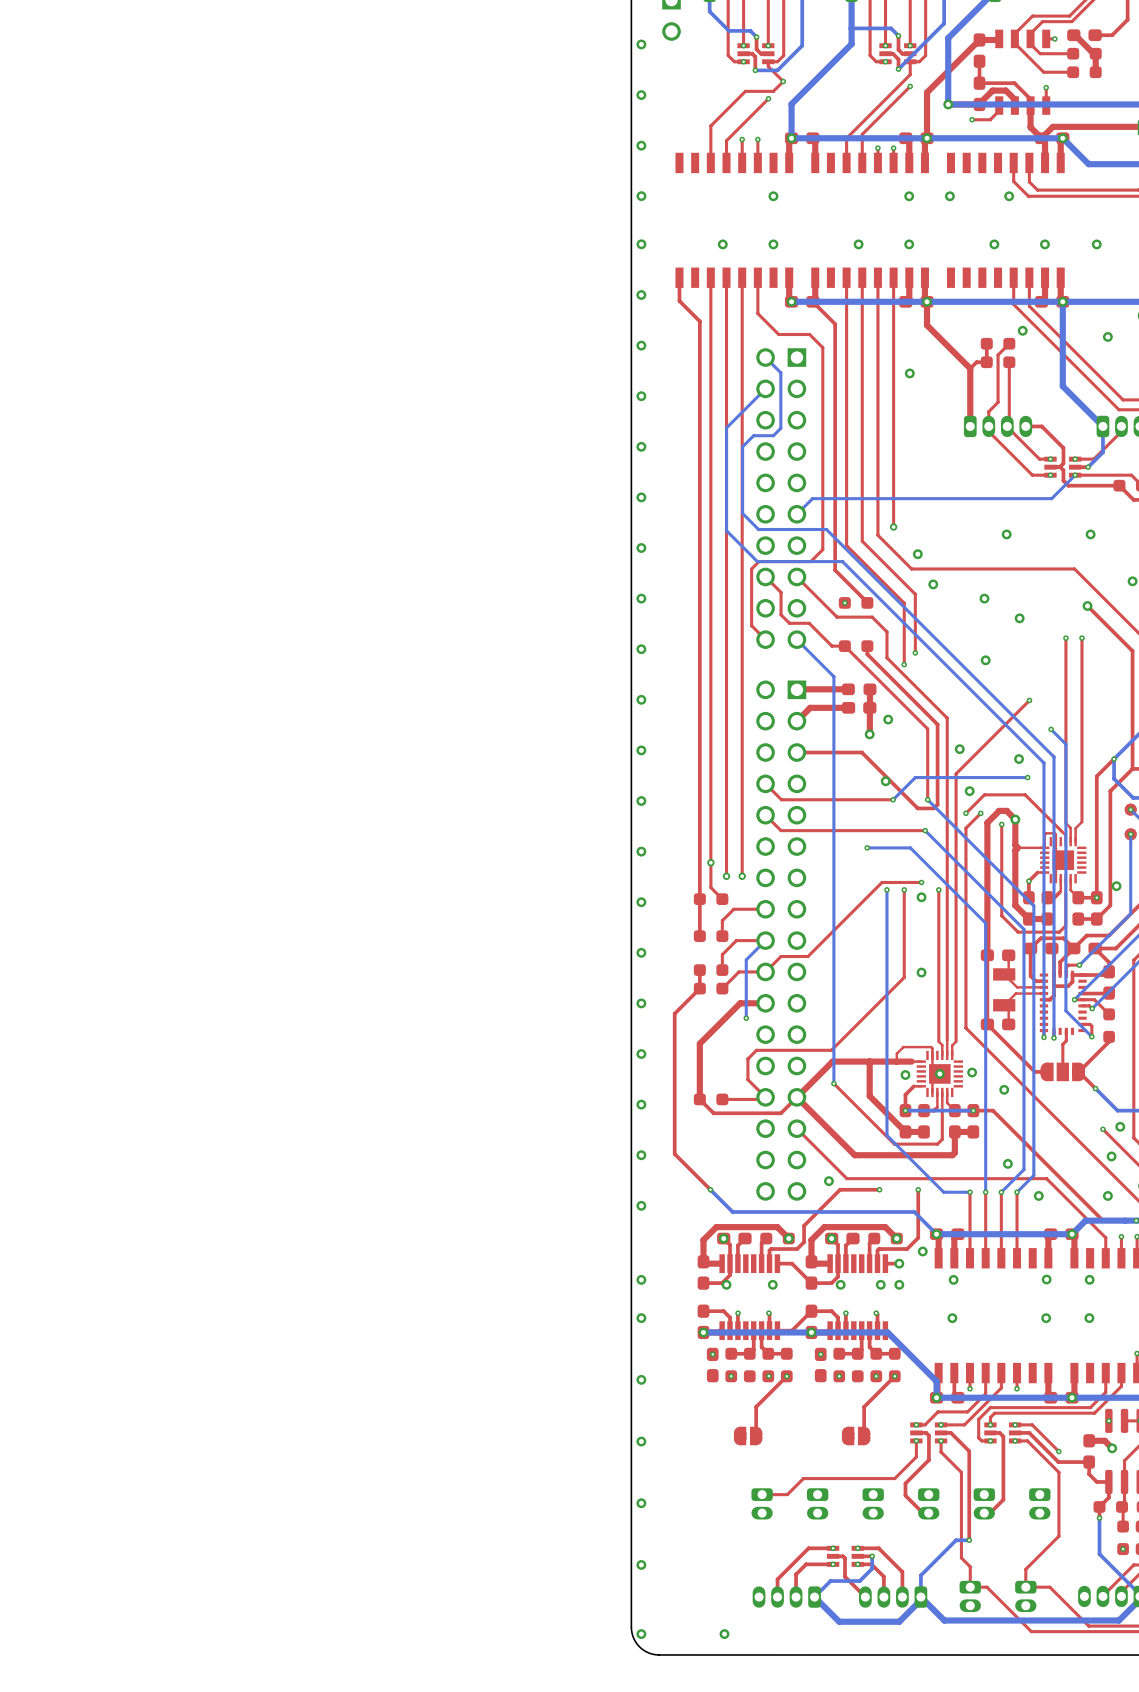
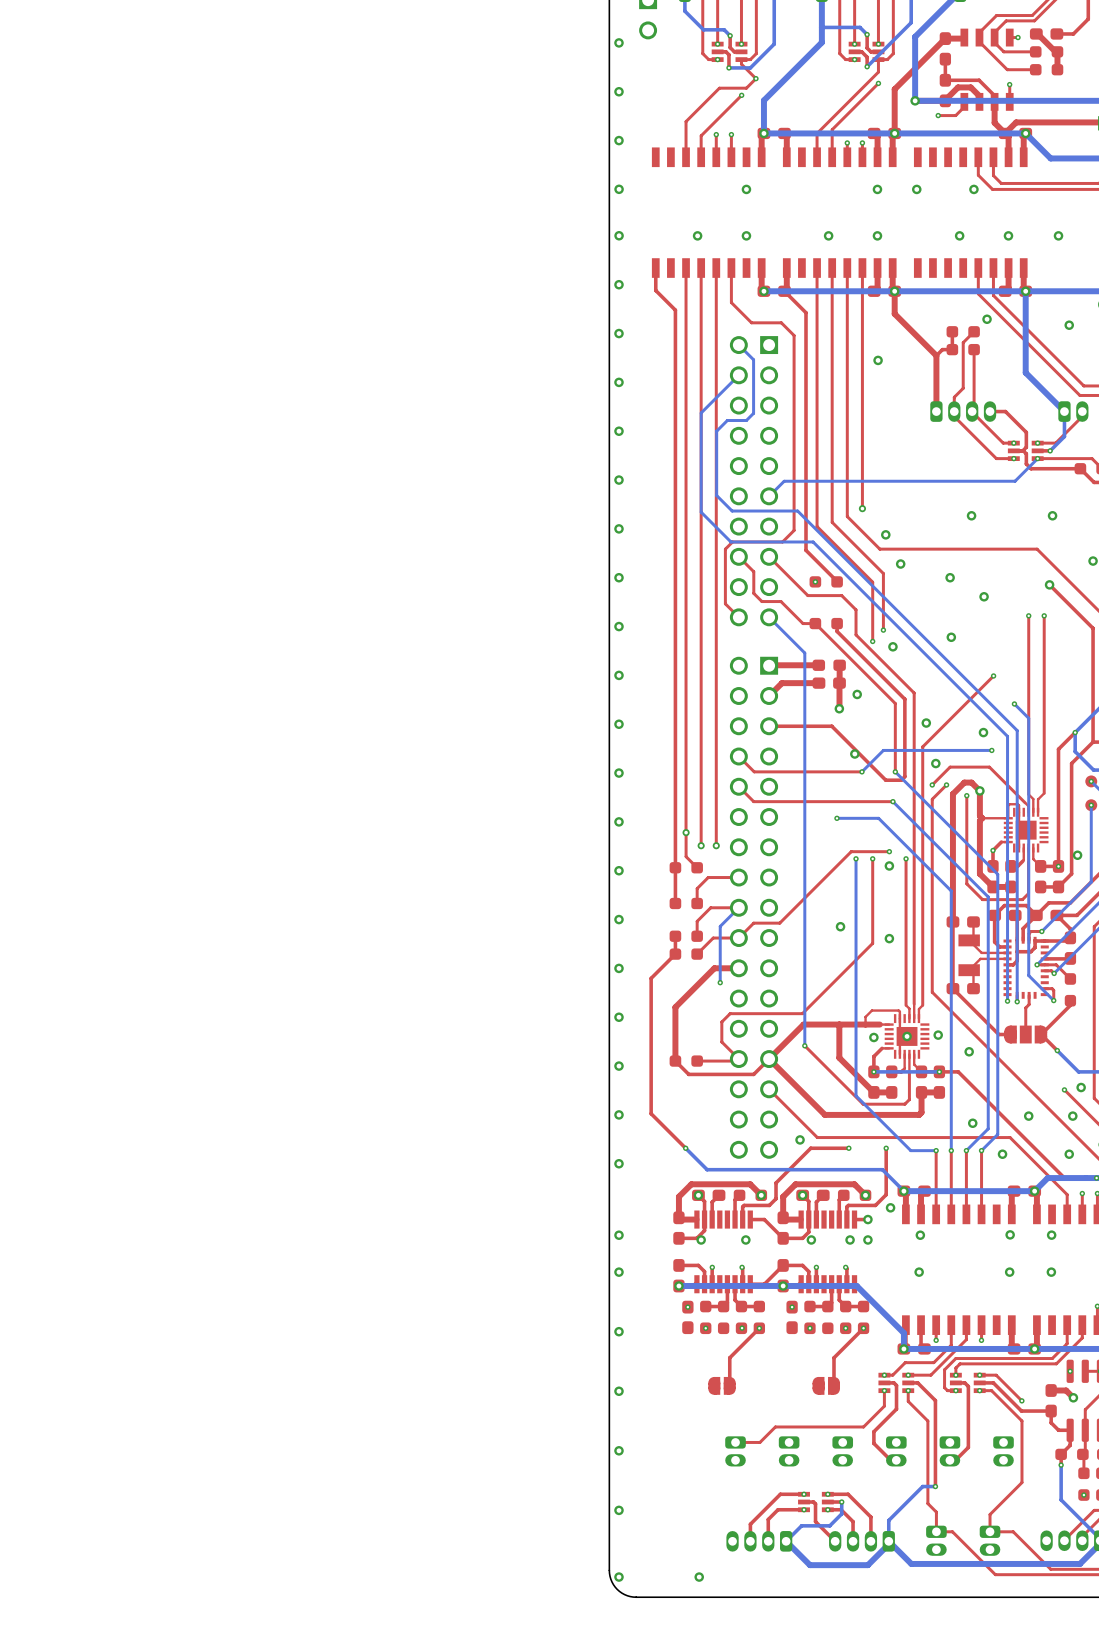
via: none -> (892, 646)
via: none -> (840, 926)
via: none -> (1028, 1116)

